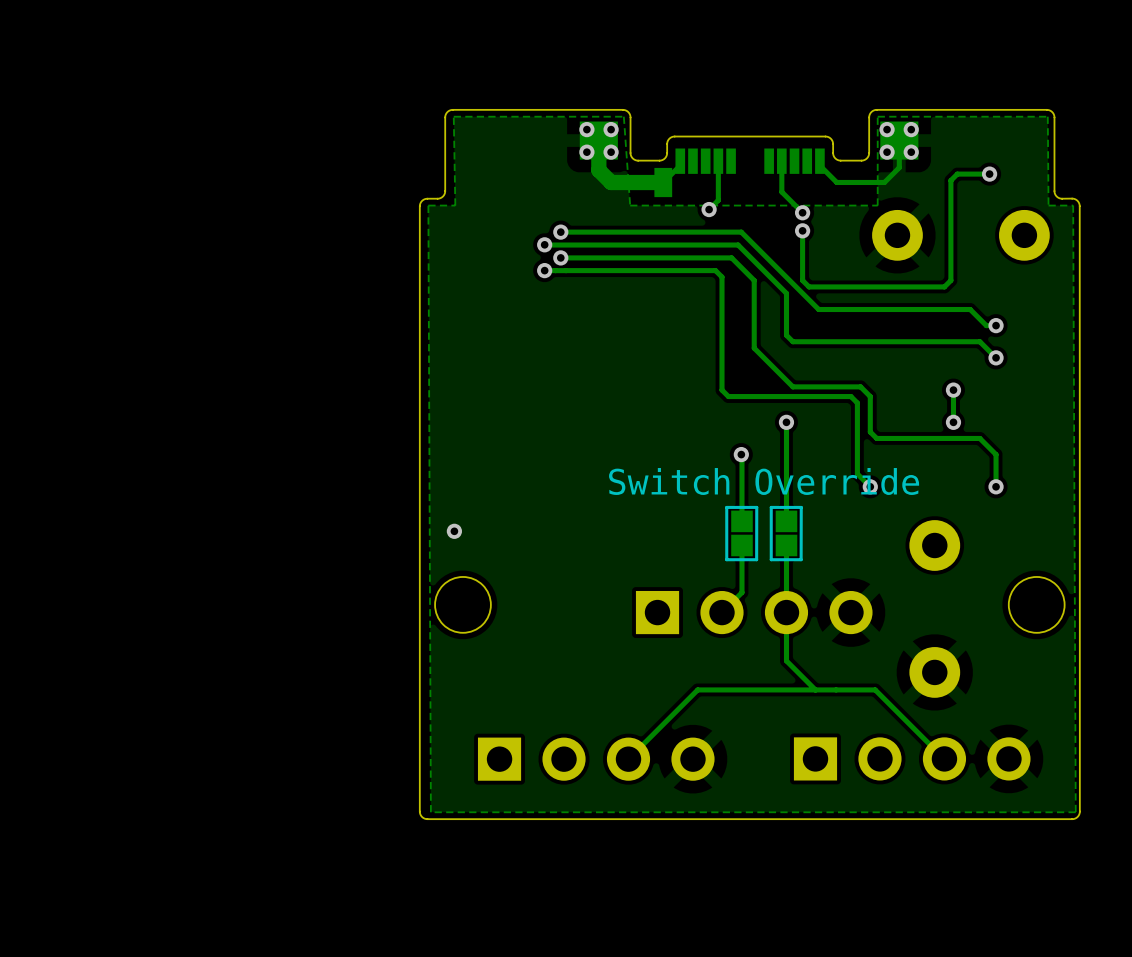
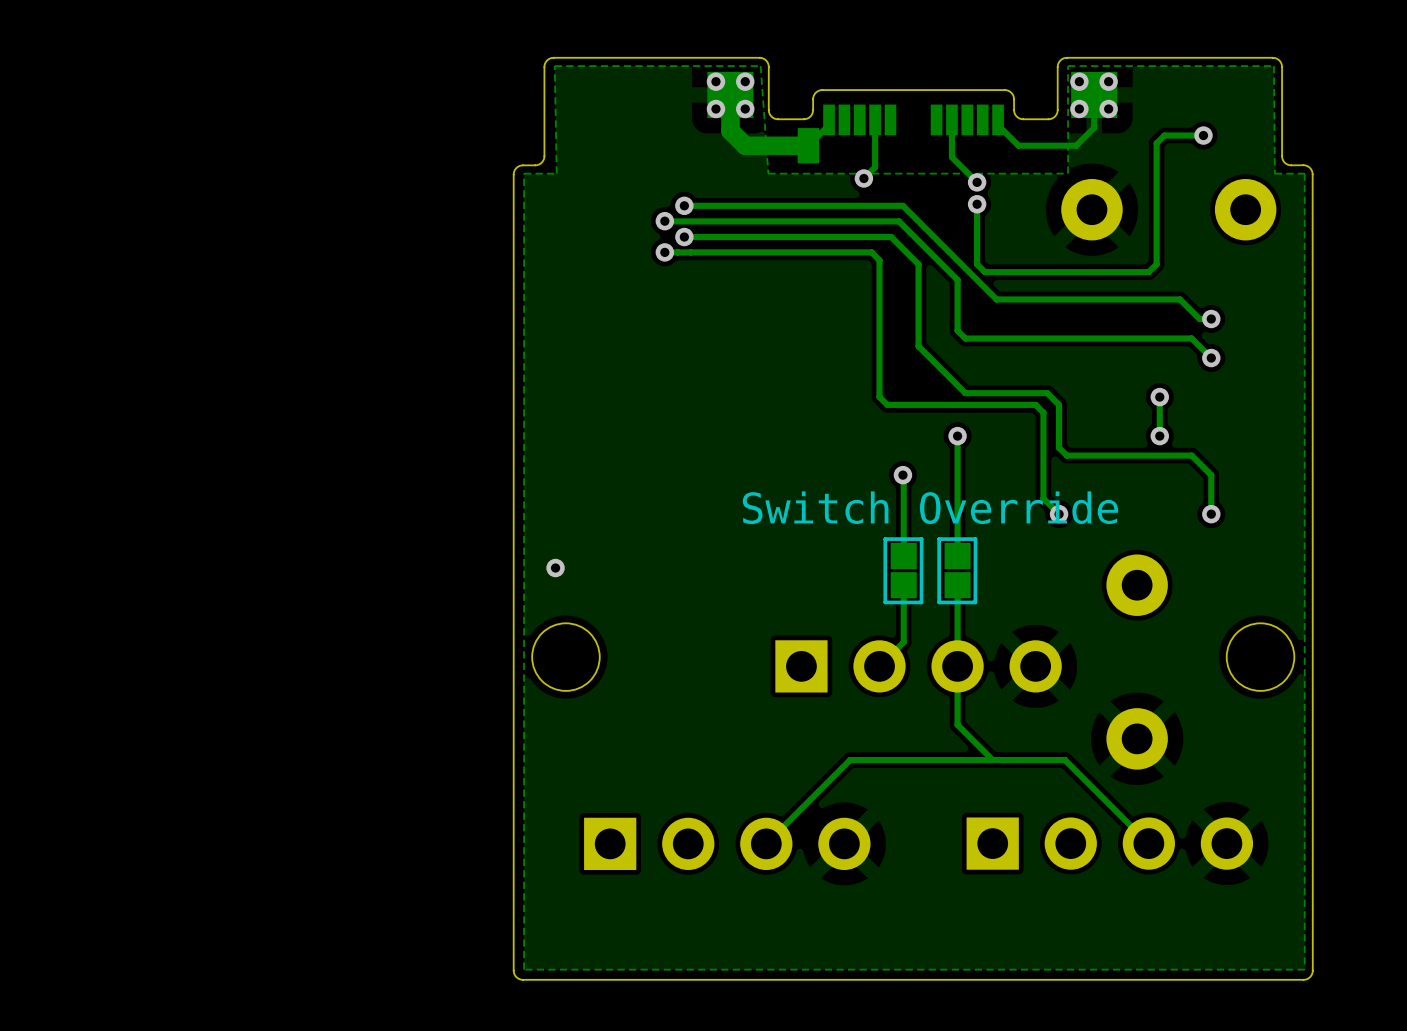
zone outline: (1073, 205) (1075, 812) (430, 812) (428, 205) -> (1304, 173) (1304, 969) (524, 969) (524, 173)
board edge: (1079, 811) (1077, 816) (1072, 819) (427, 819) (422, 816) (419, 811) -> (1312, 970) (1310, 977) (1303, 979) (521, 979) (516, 977) (513, 971) (513, 907)

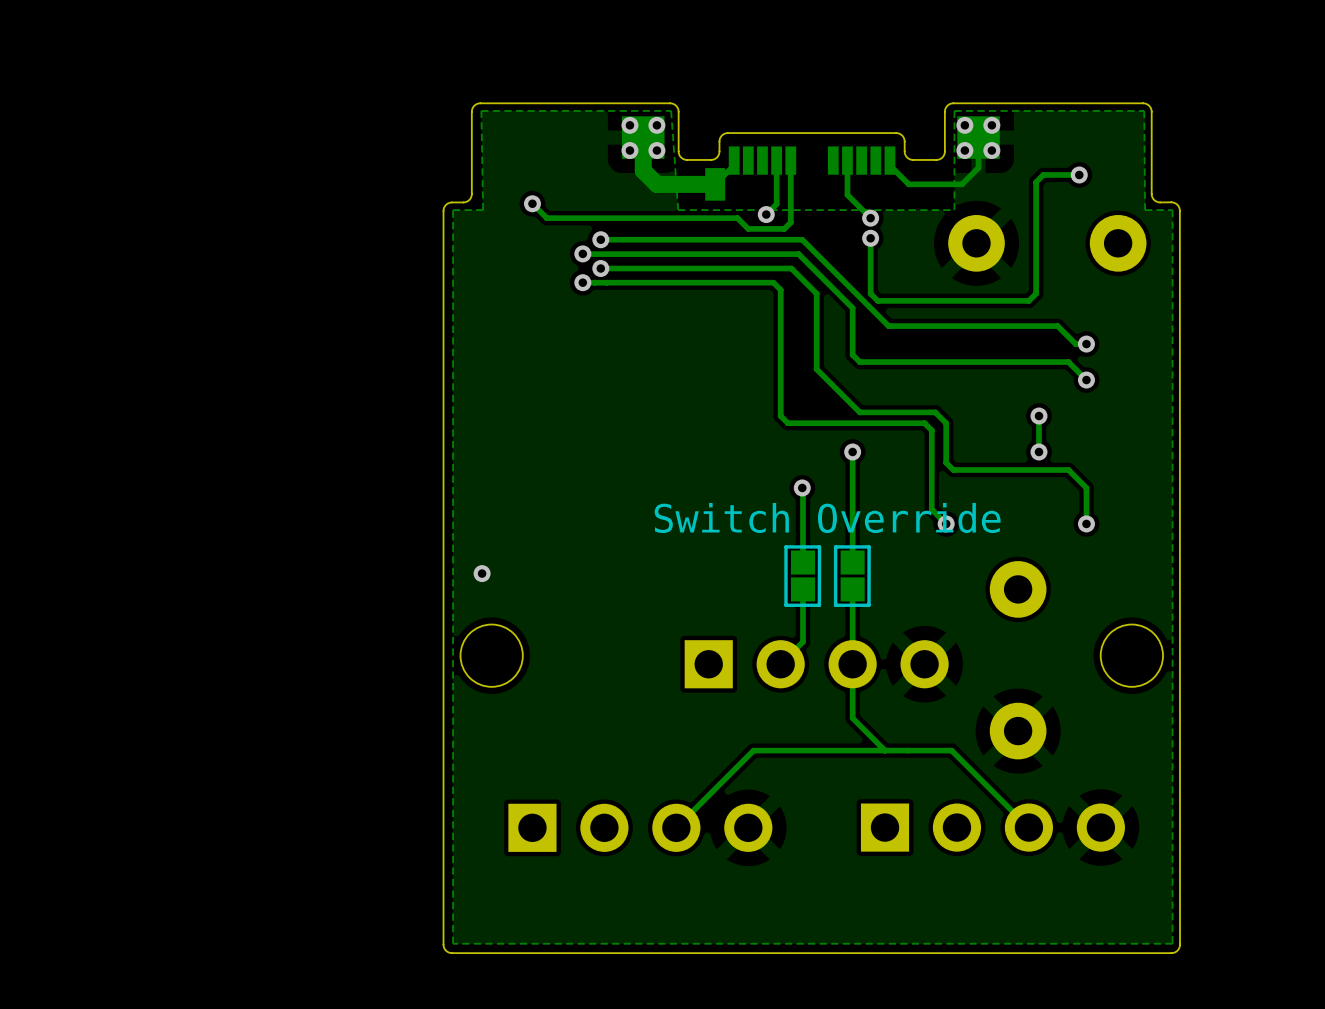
track: none -> (790, 160) (790, 222) (784, 228) (748, 228) (737, 218) (546, 218) (532, 203)
via: none -> (532, 203)

